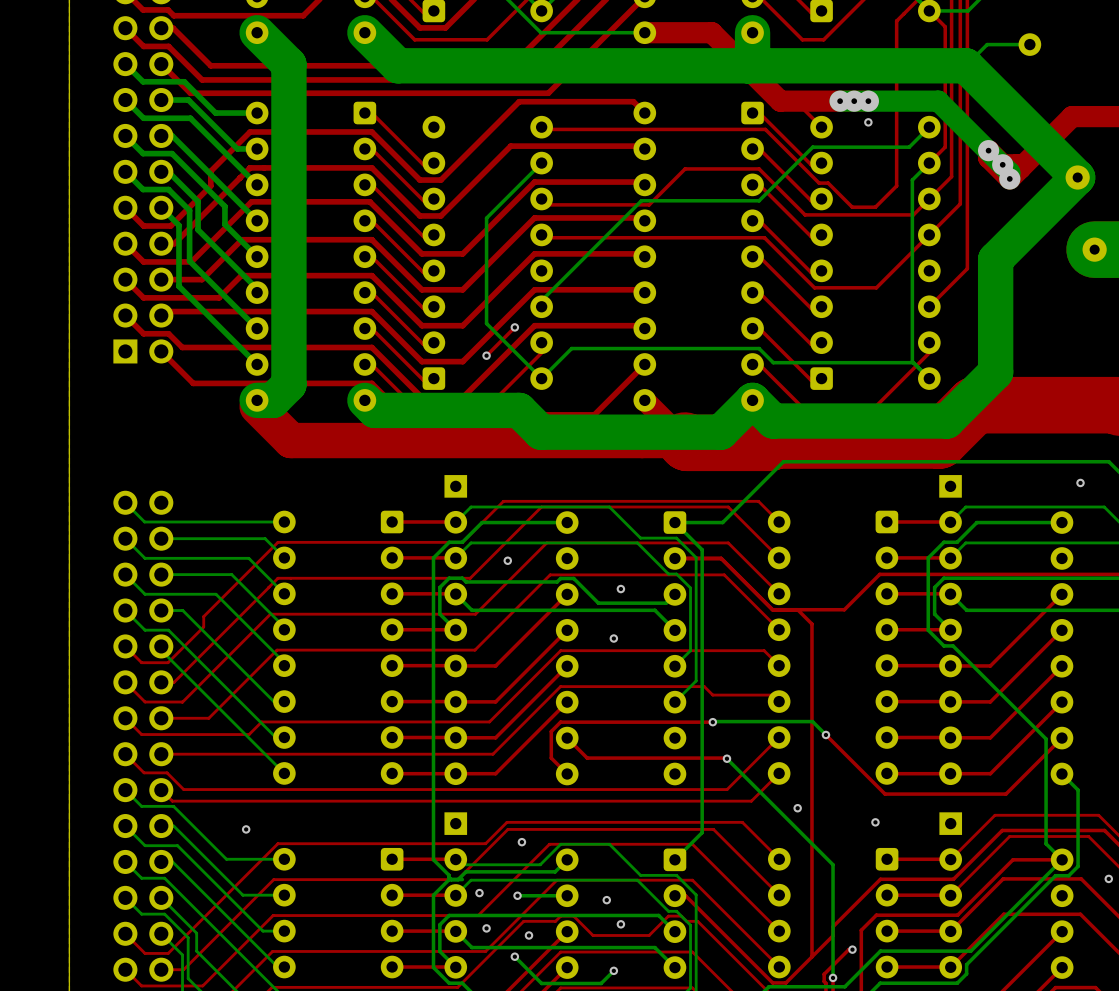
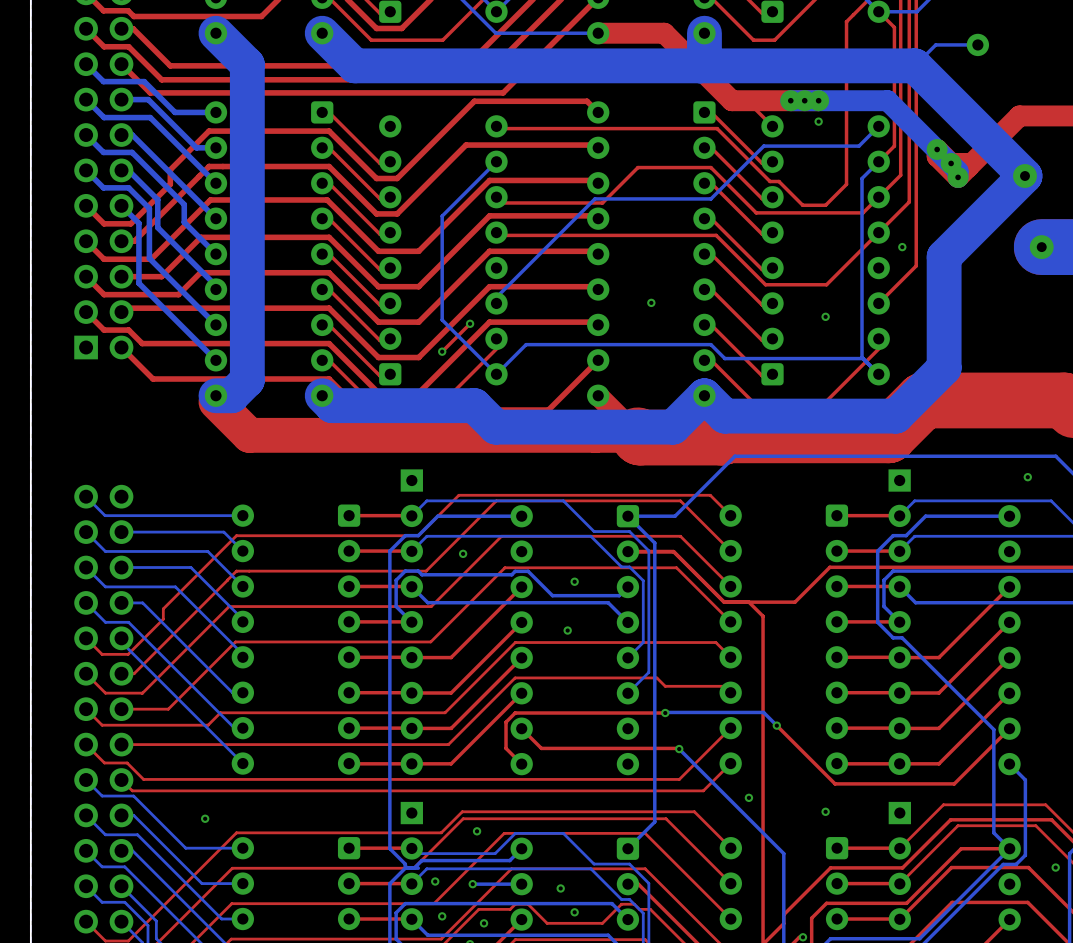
via: none -> (902, 247)
via: none -> (651, 302)
via: none -> (825, 316)

